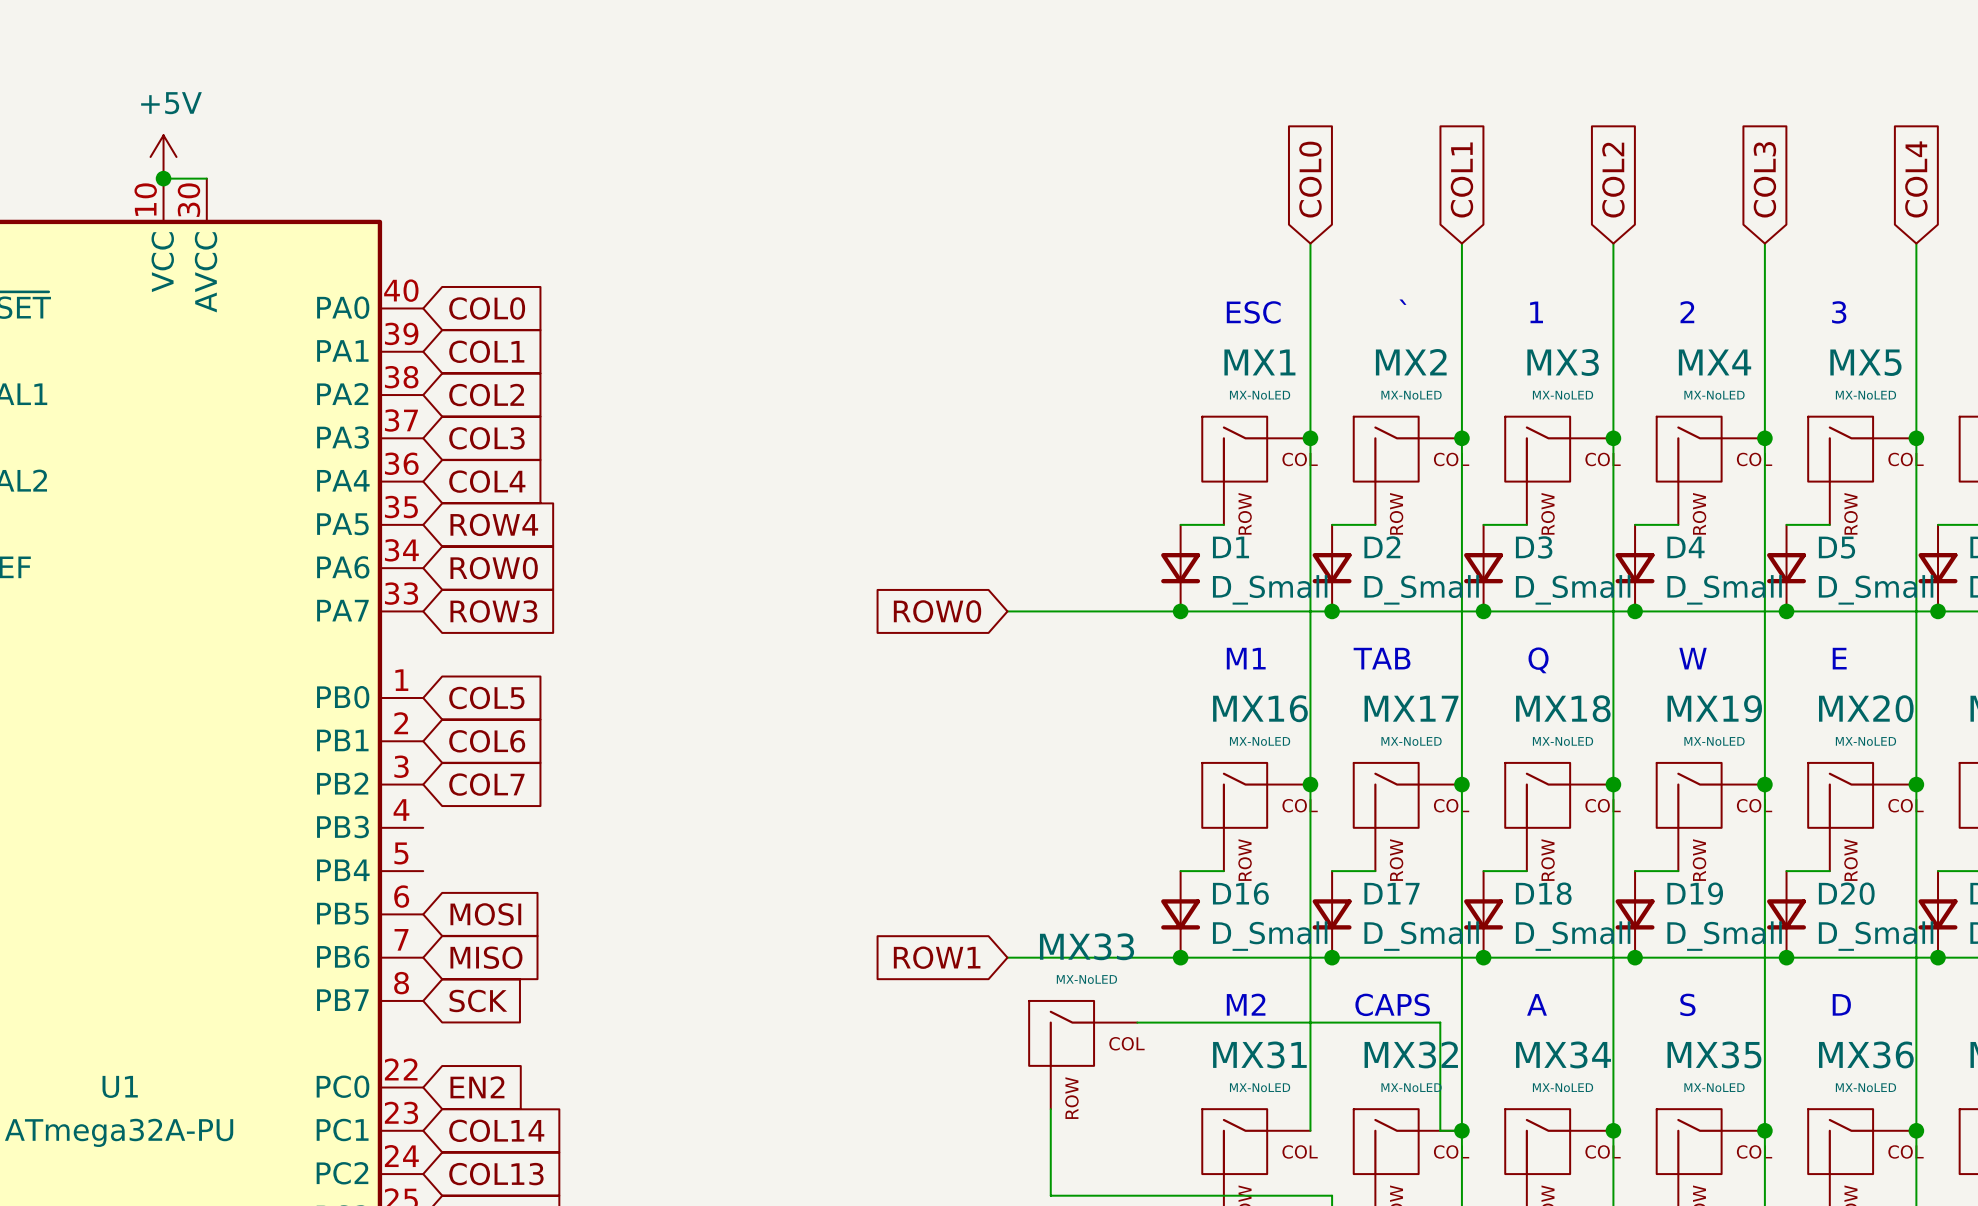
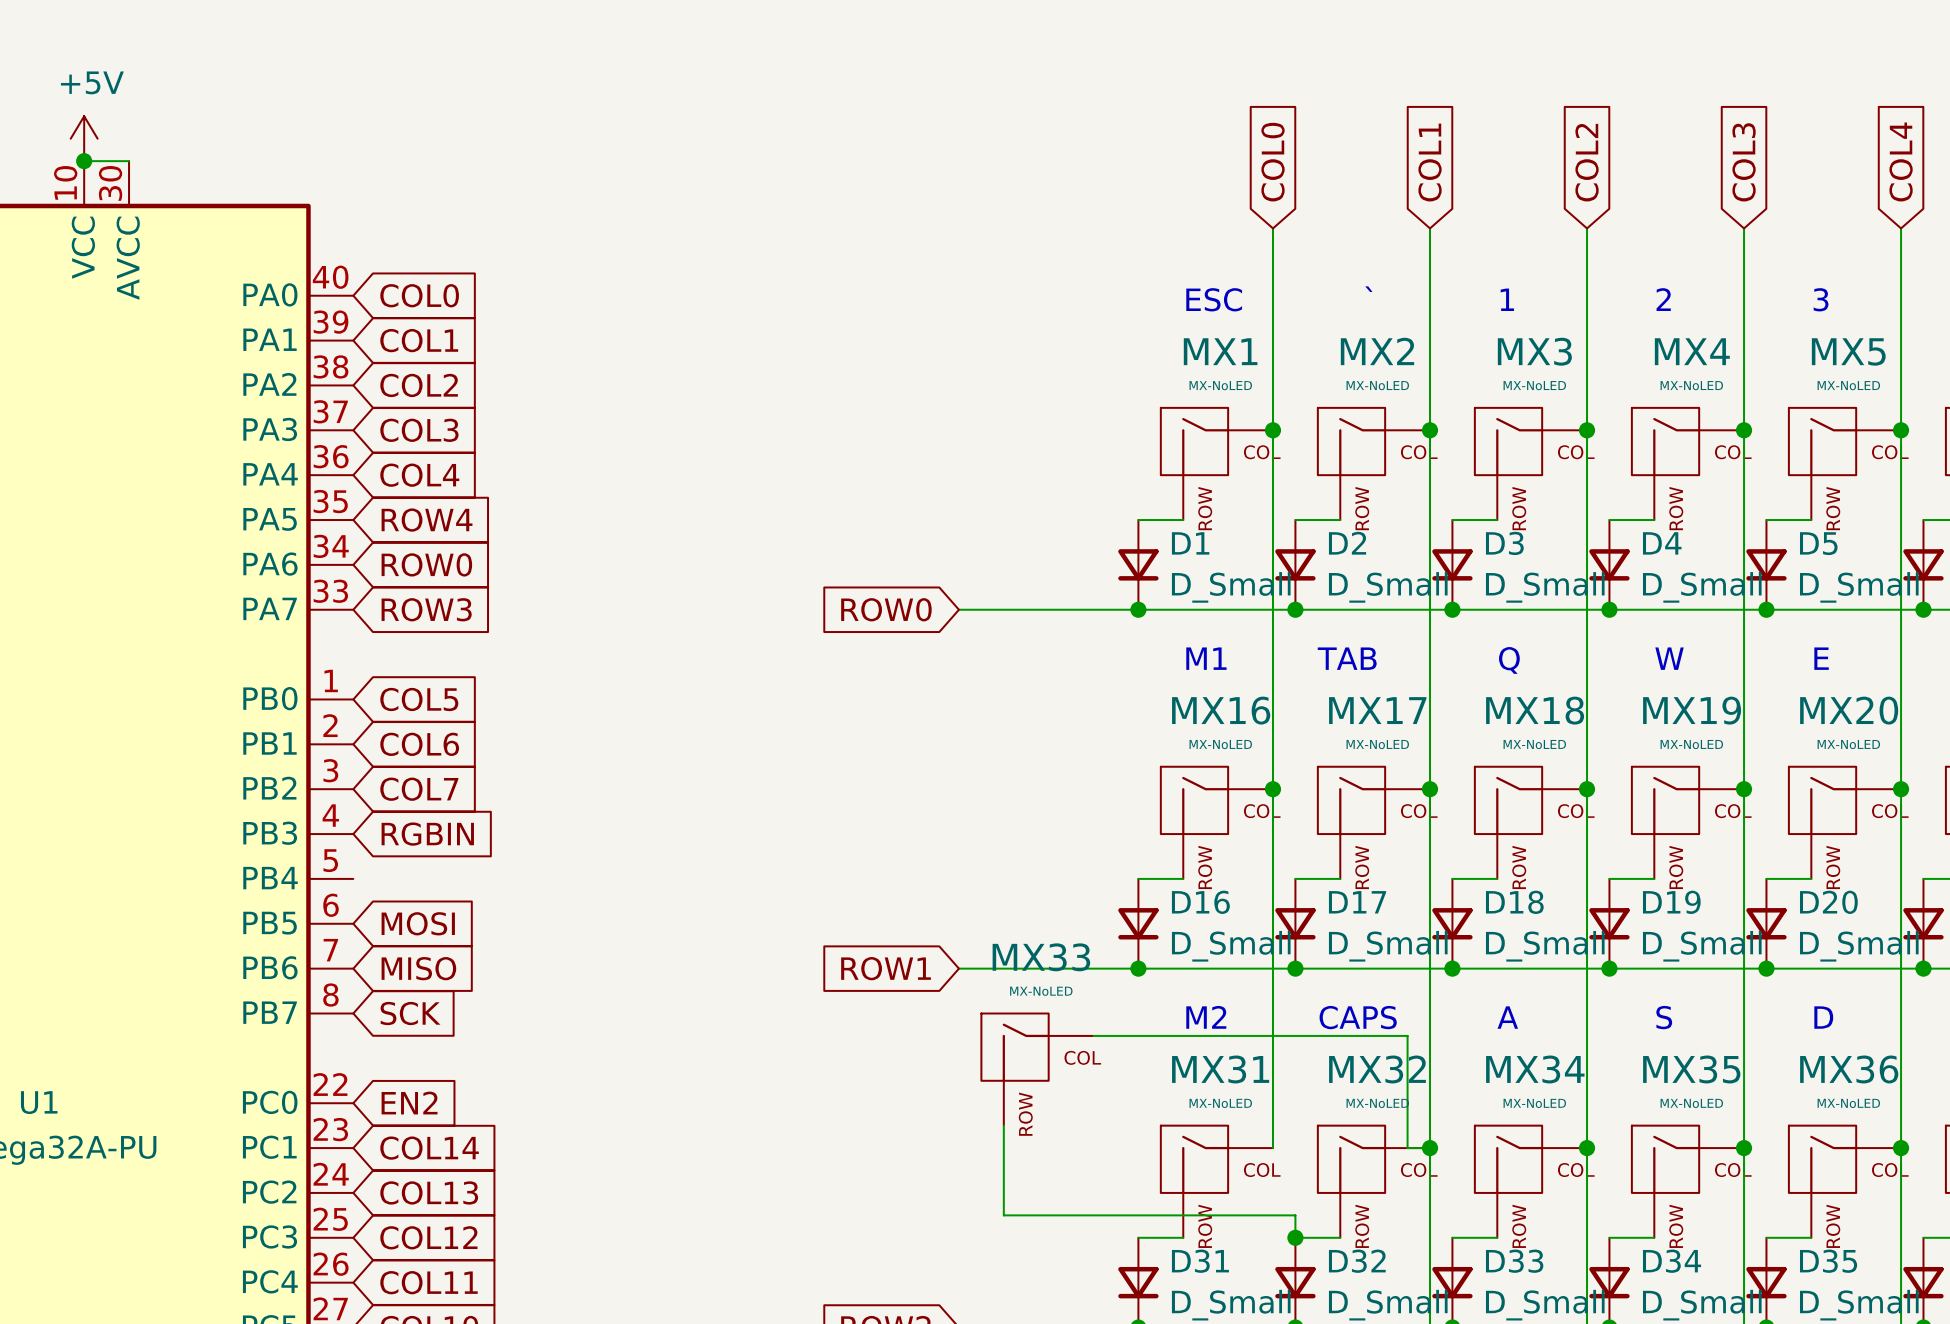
global label: none -> RGBIN (427, 834)

